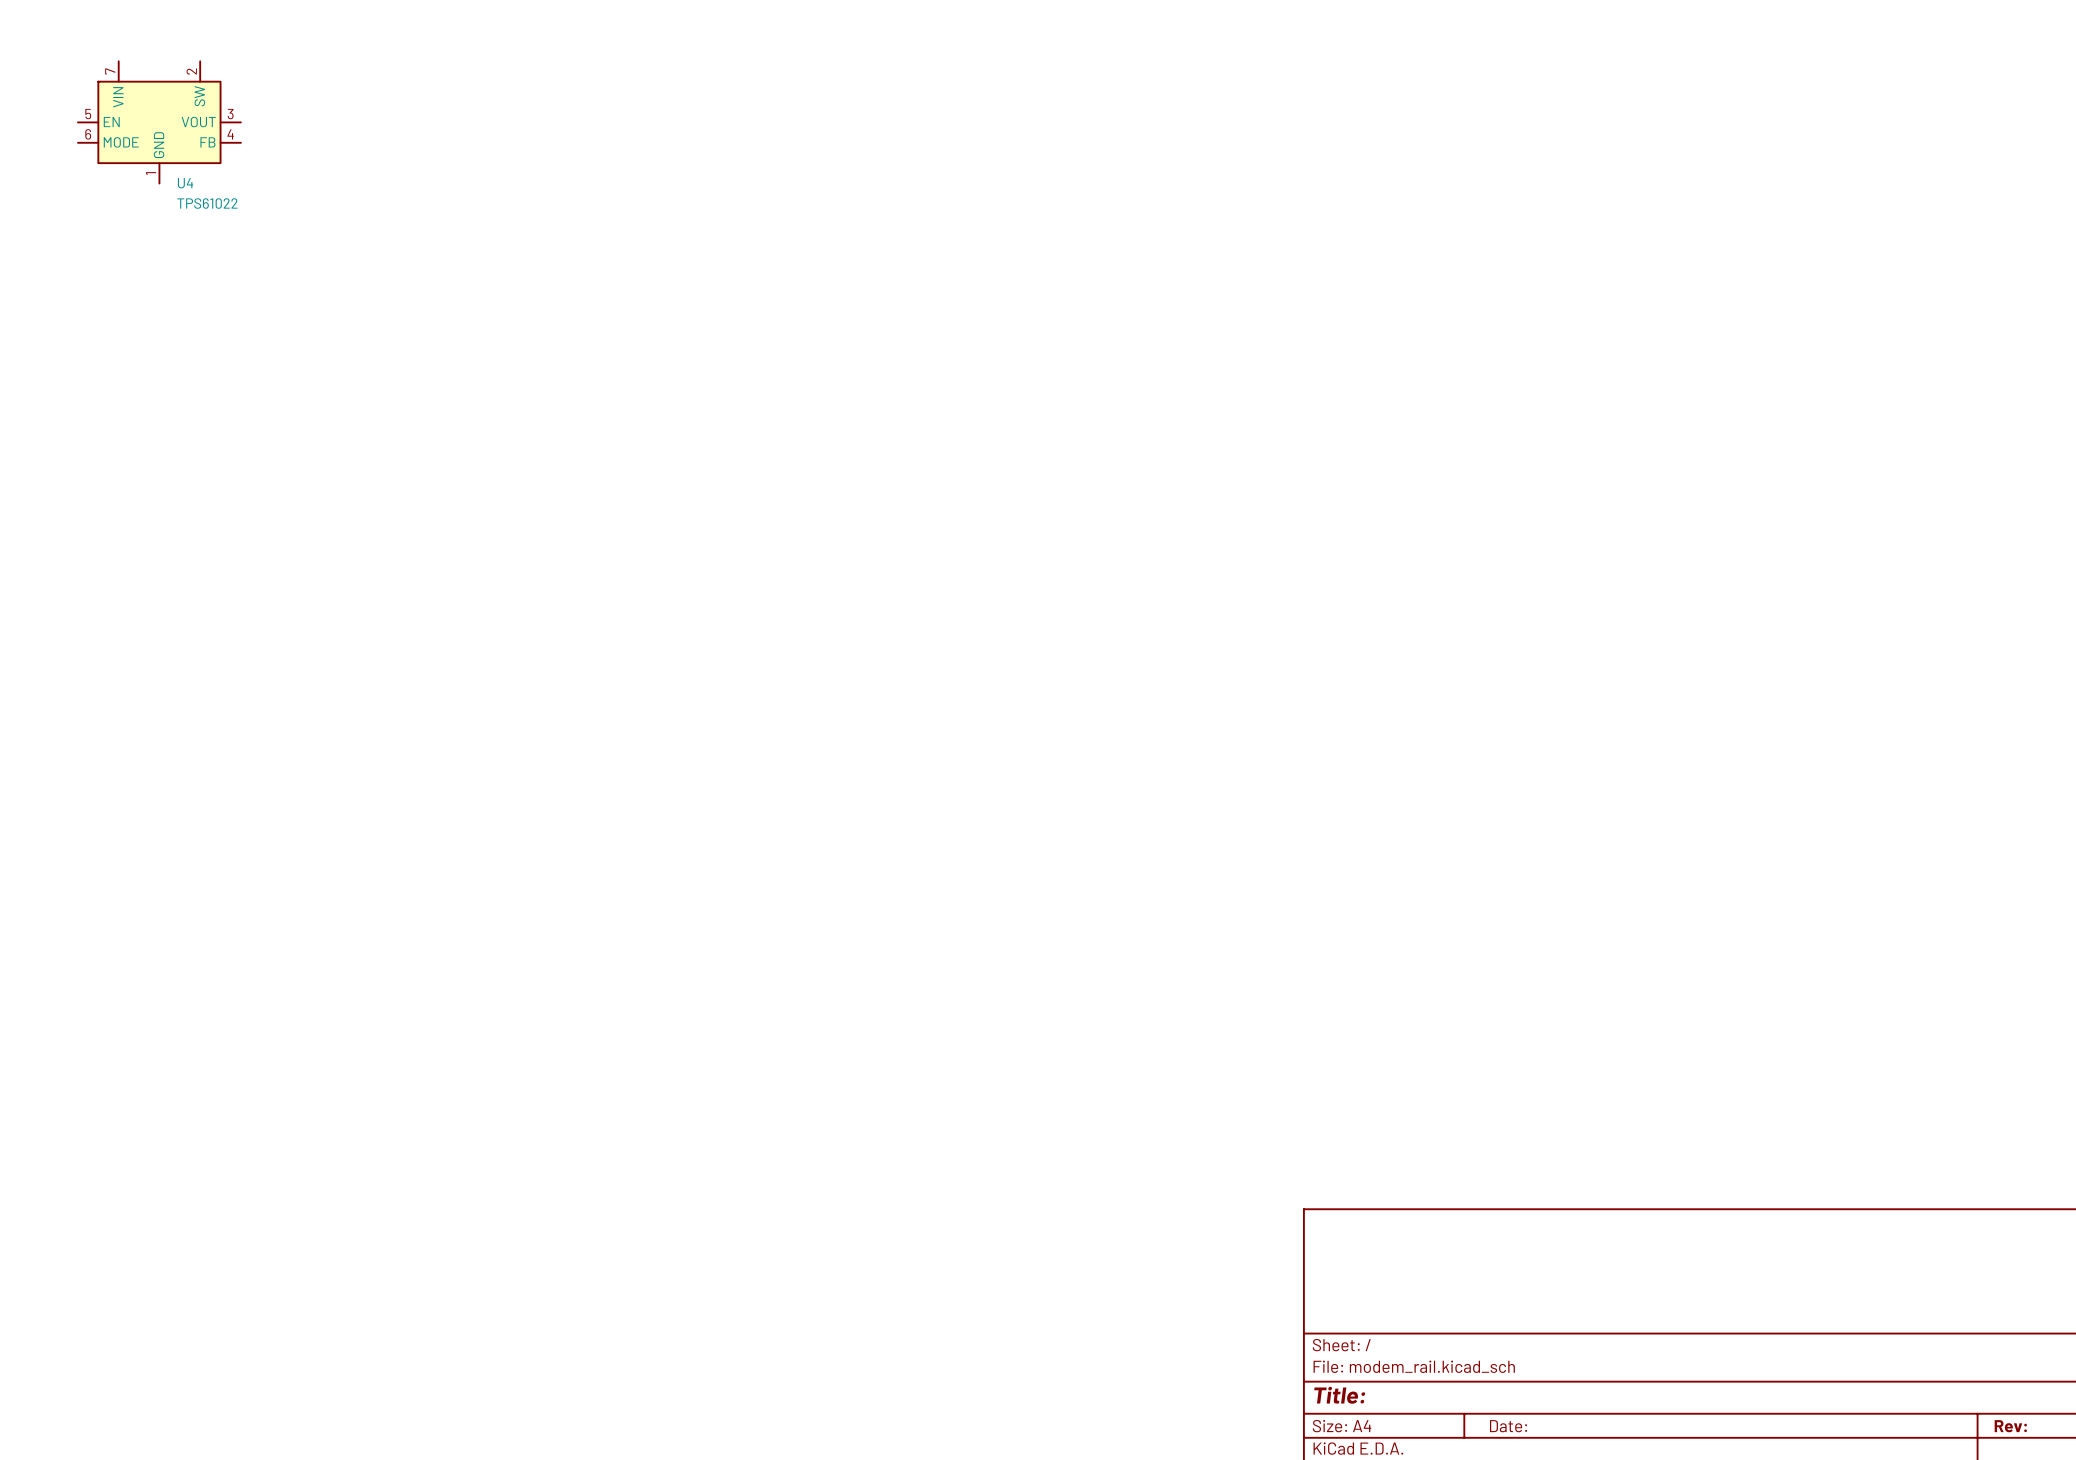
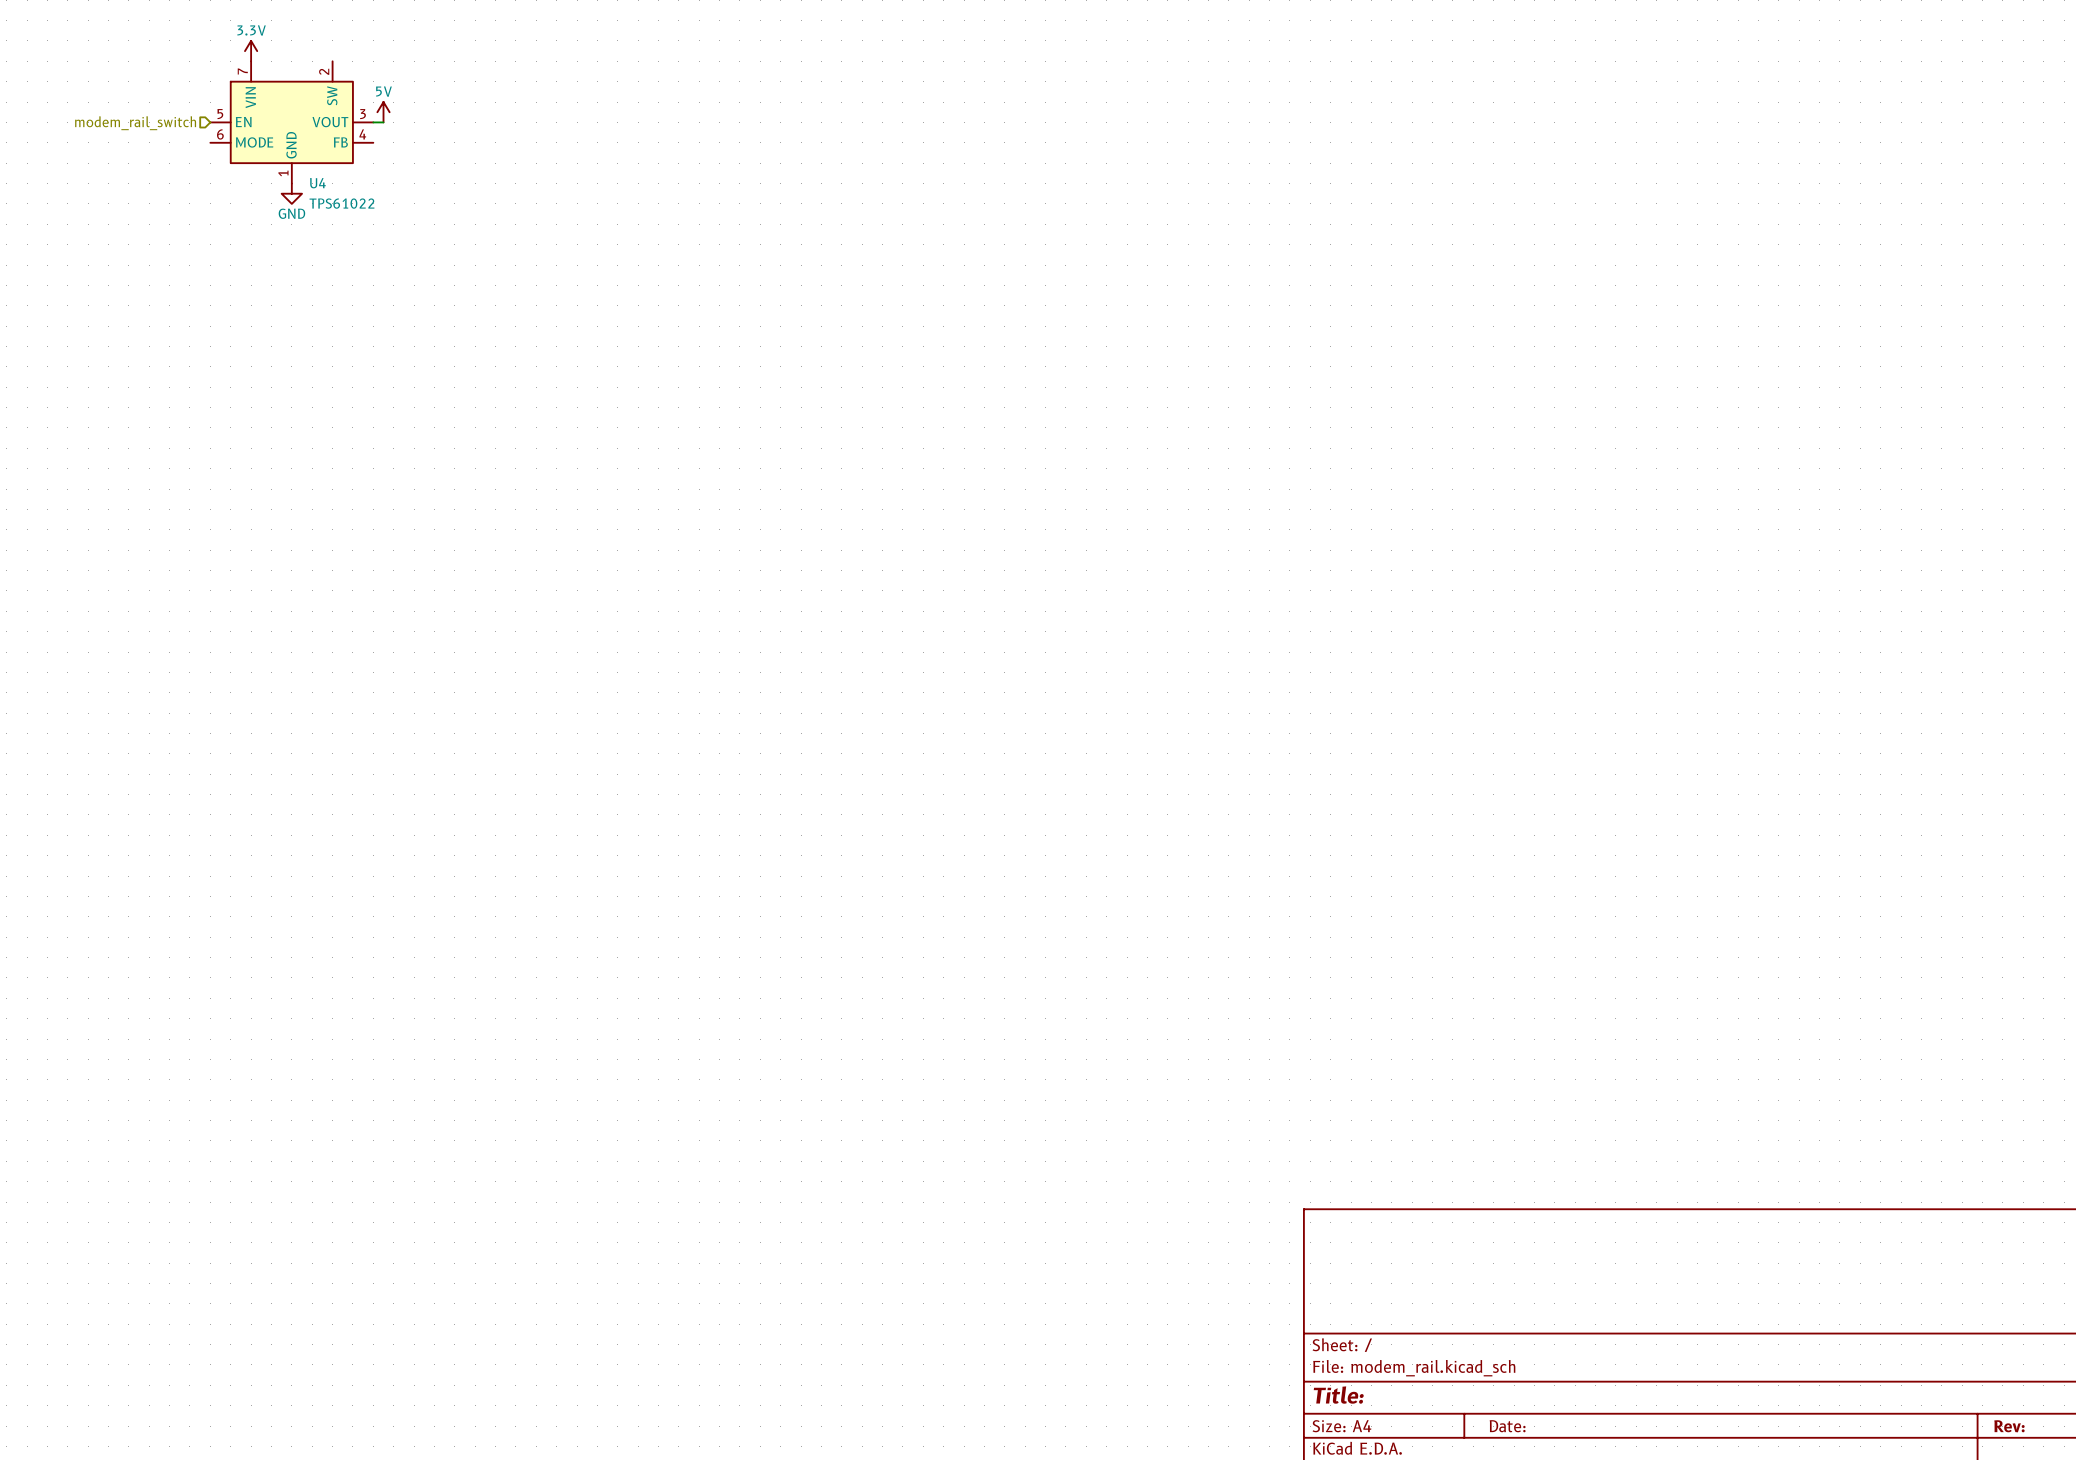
power symbol: none -> 3.3V (251, 51)
power symbol: none -> 5V (383, 112)
hierarchical label: none -> modem_rail_switch (135, 123)
U4 position: (159, 122) -> (291, 122)
wire: none -> (373, 122) (383, 122)
power symbol: none -> GND (291, 193)

